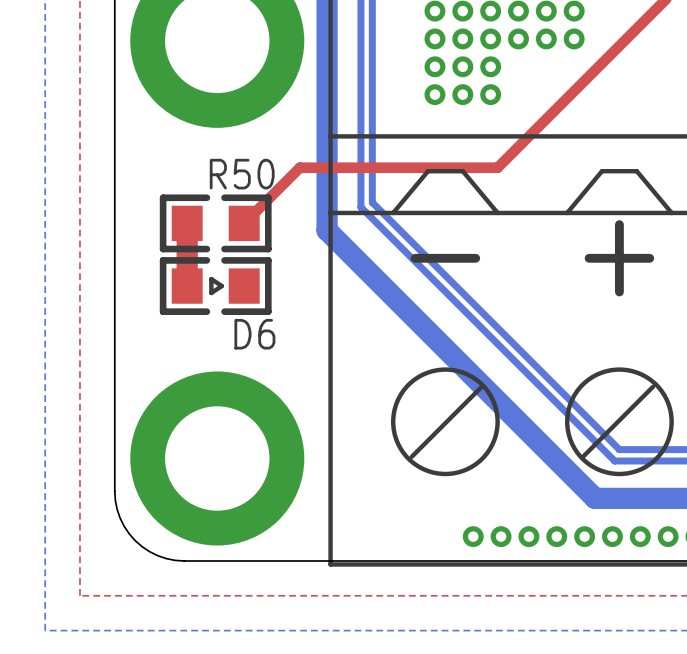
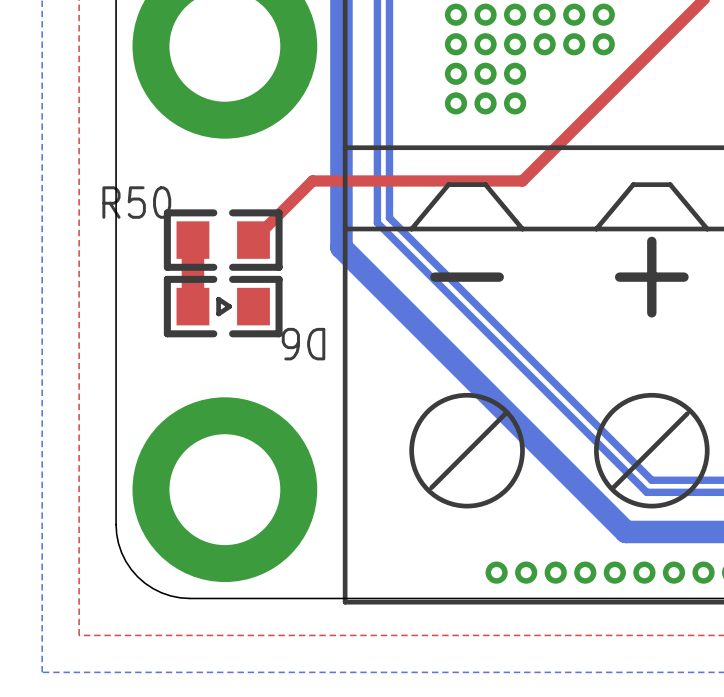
R50 name position: R50 (242, 174) -> R50 (136, 202)
D6 name rotation: 0° (254, 334) -> 180° (303, 344)

